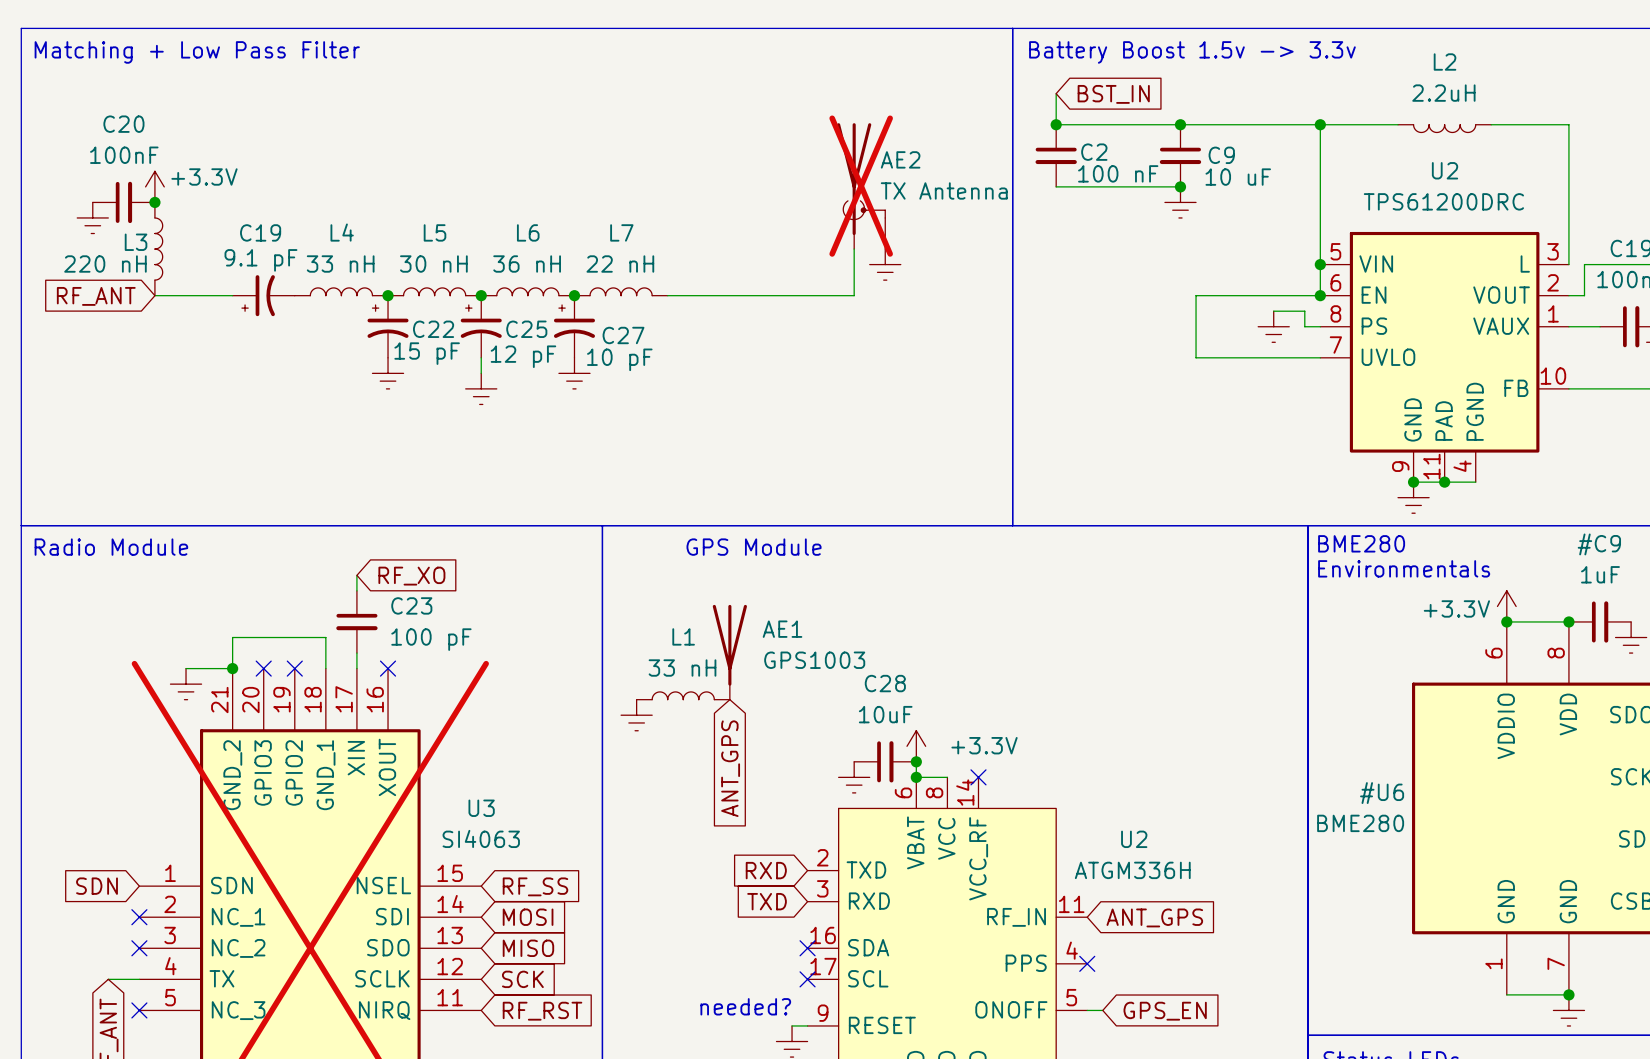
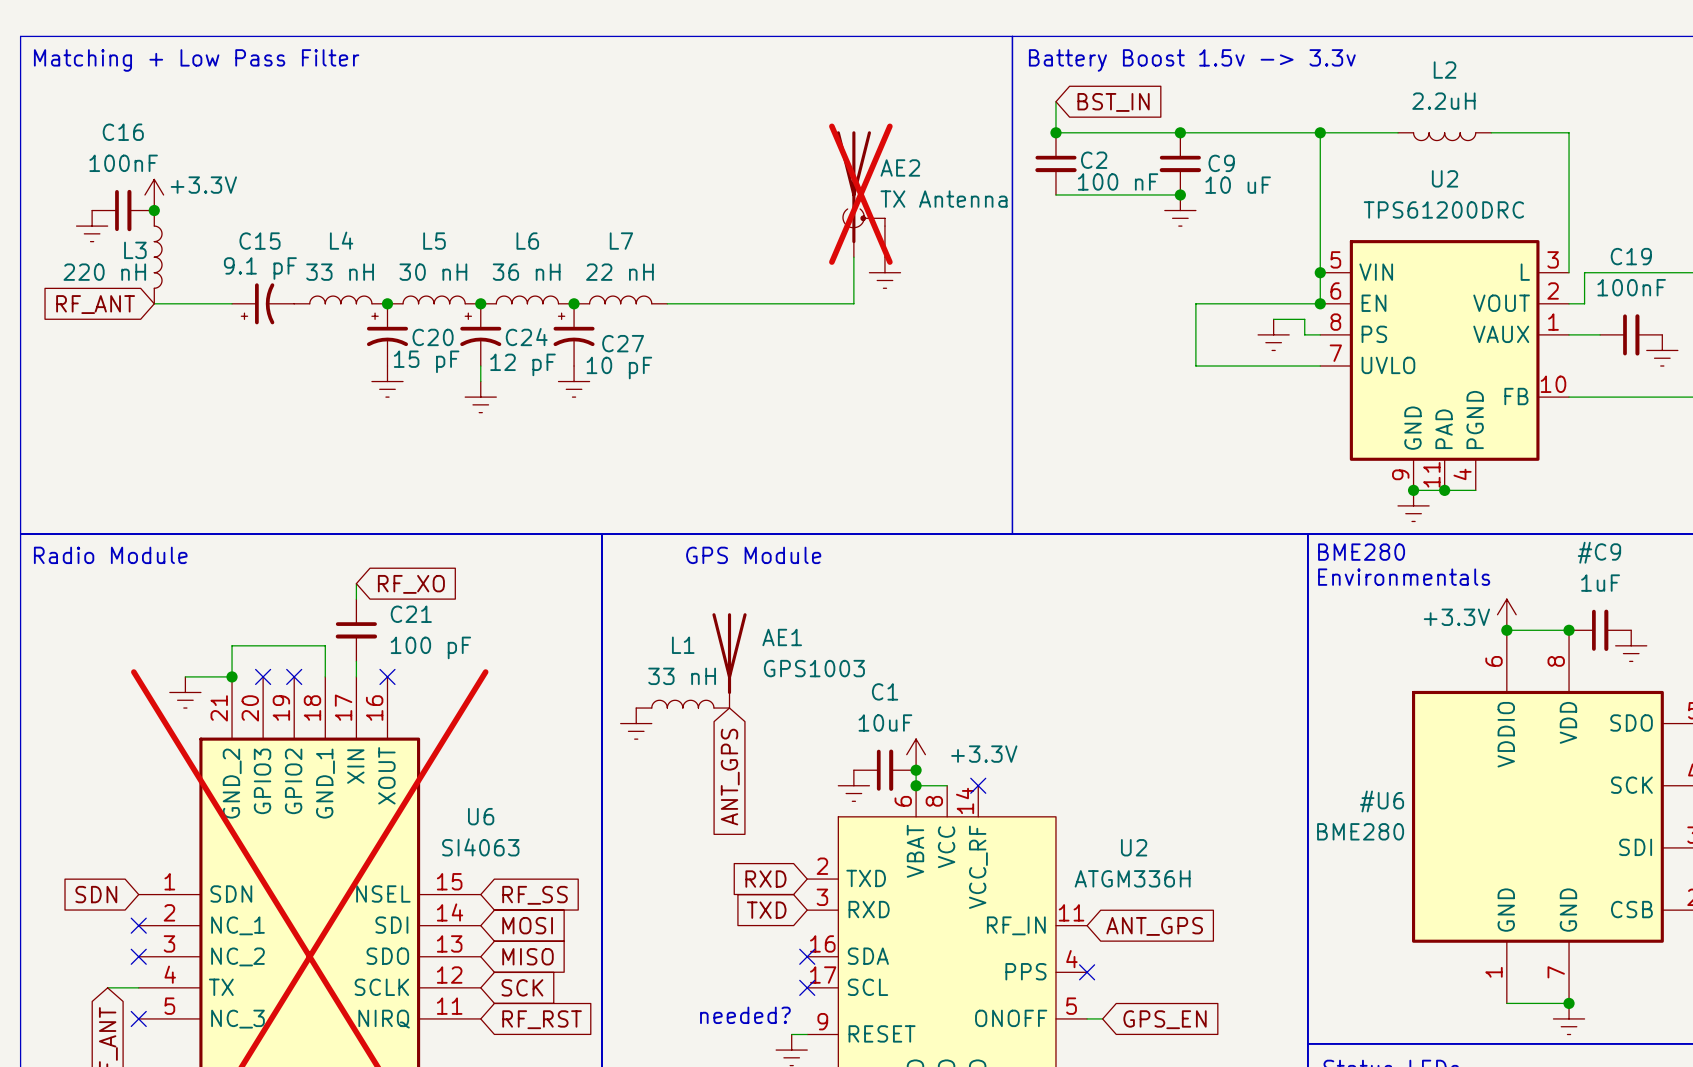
C20 name: C20 (123, 124) -> C16 (123, 132)
C19 name: C19 (260, 232) -> C15 (260, 241)
C22 name: C22 (433, 329) -> C20 (433, 337)
C25 name: C25 (526, 329) -> C24 (526, 337)
C23 name: C23 (411, 605) -> C21 (411, 614)
C28 name: C28 (885, 683) -> C1 (885, 691)
U3 name: U3 (481, 808) -> U6 (481, 816)

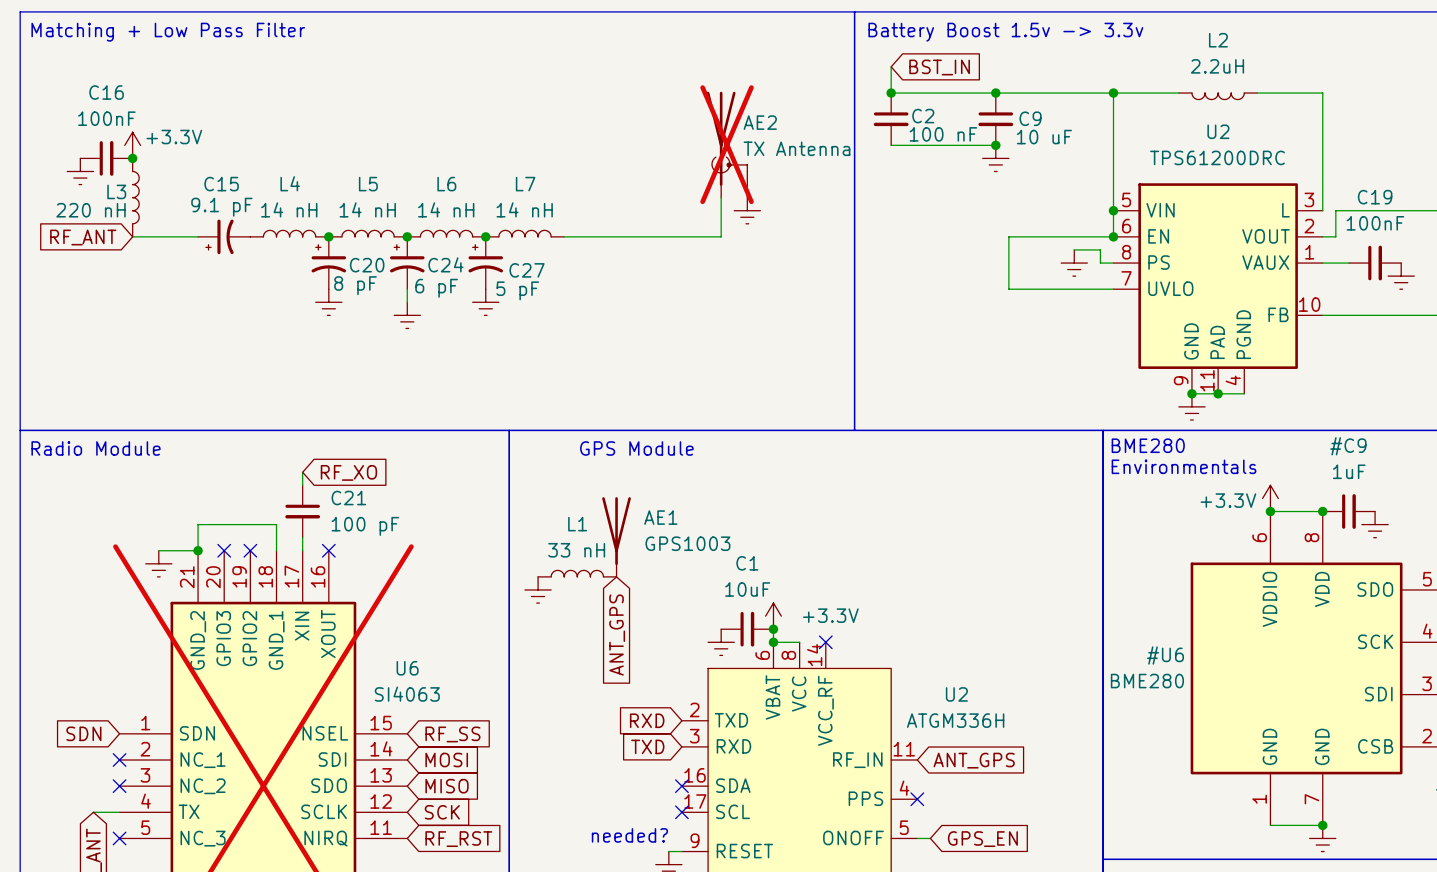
L4 value: 33 nH (340, 272) -> 14 nH (289, 209)
L5 value: 30 nH (433, 272) -> 14 nH (367, 209)
L6 value: 36 nH (526, 272) -> 14 nH (446, 209)
L7 value: 22 nH (619, 272) -> 14 nH (524, 209)
C20 value: 15 pF (426, 361) -> 8 pF (355, 285)
C24 value: 12 pF (523, 364) -> 6 pF (436, 288)
C27 value: 10 pF (619, 368) -> 5 pF (517, 290)

